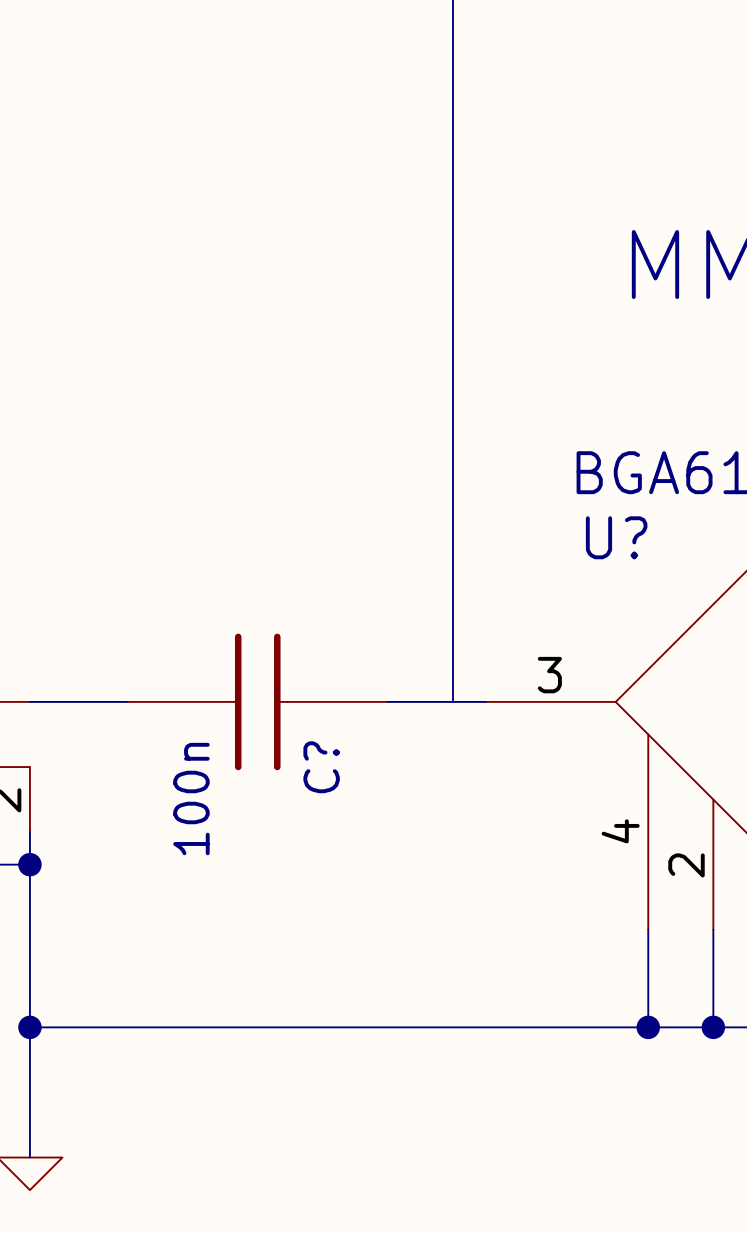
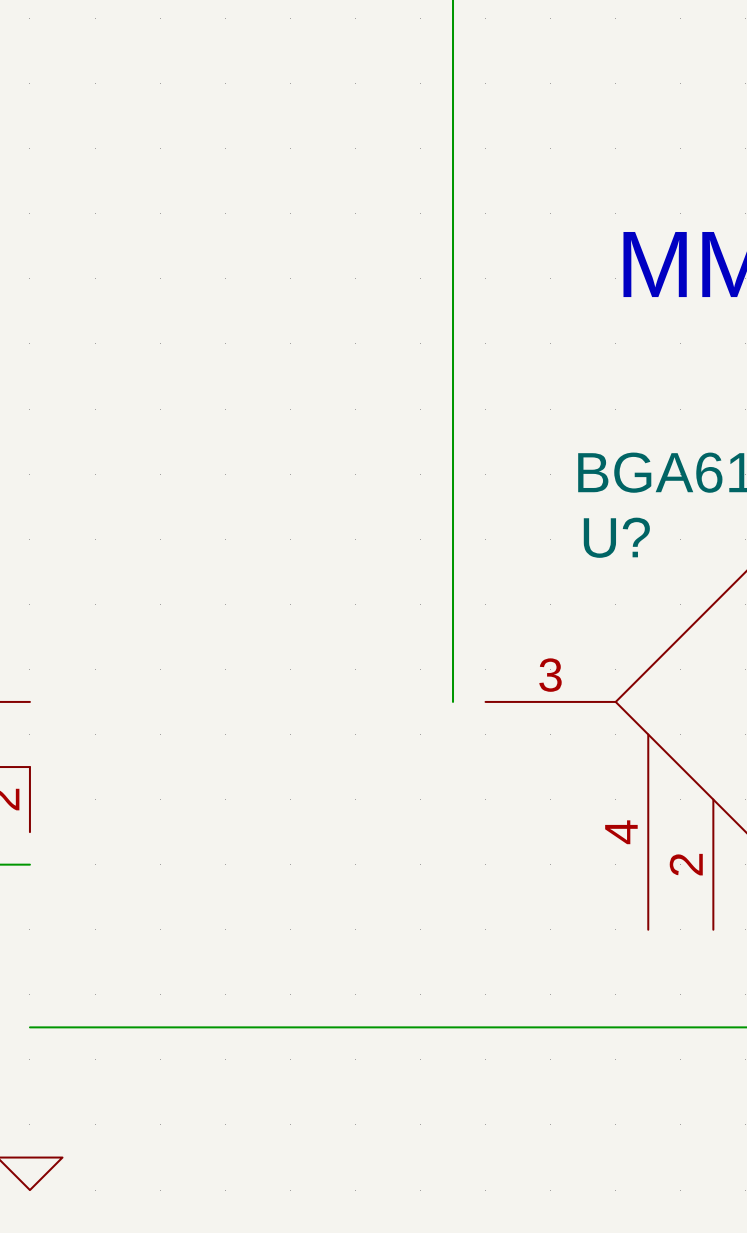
wire: (29, 701) (127, 701) -> none
C?: 100n (257, 701) -> none
wire: (387, 701) (485, 701) -> none
wire: (29, 832) (29, 1157) -> none
junction: (29, 864) -> none
wire: (648, 929) (648, 1027) -> none
wire: (713, 929) (713, 1027) -> none
junction: (29, 1027) -> none
junction: (648, 1027) -> none
junction: (713, 1027) -> none

